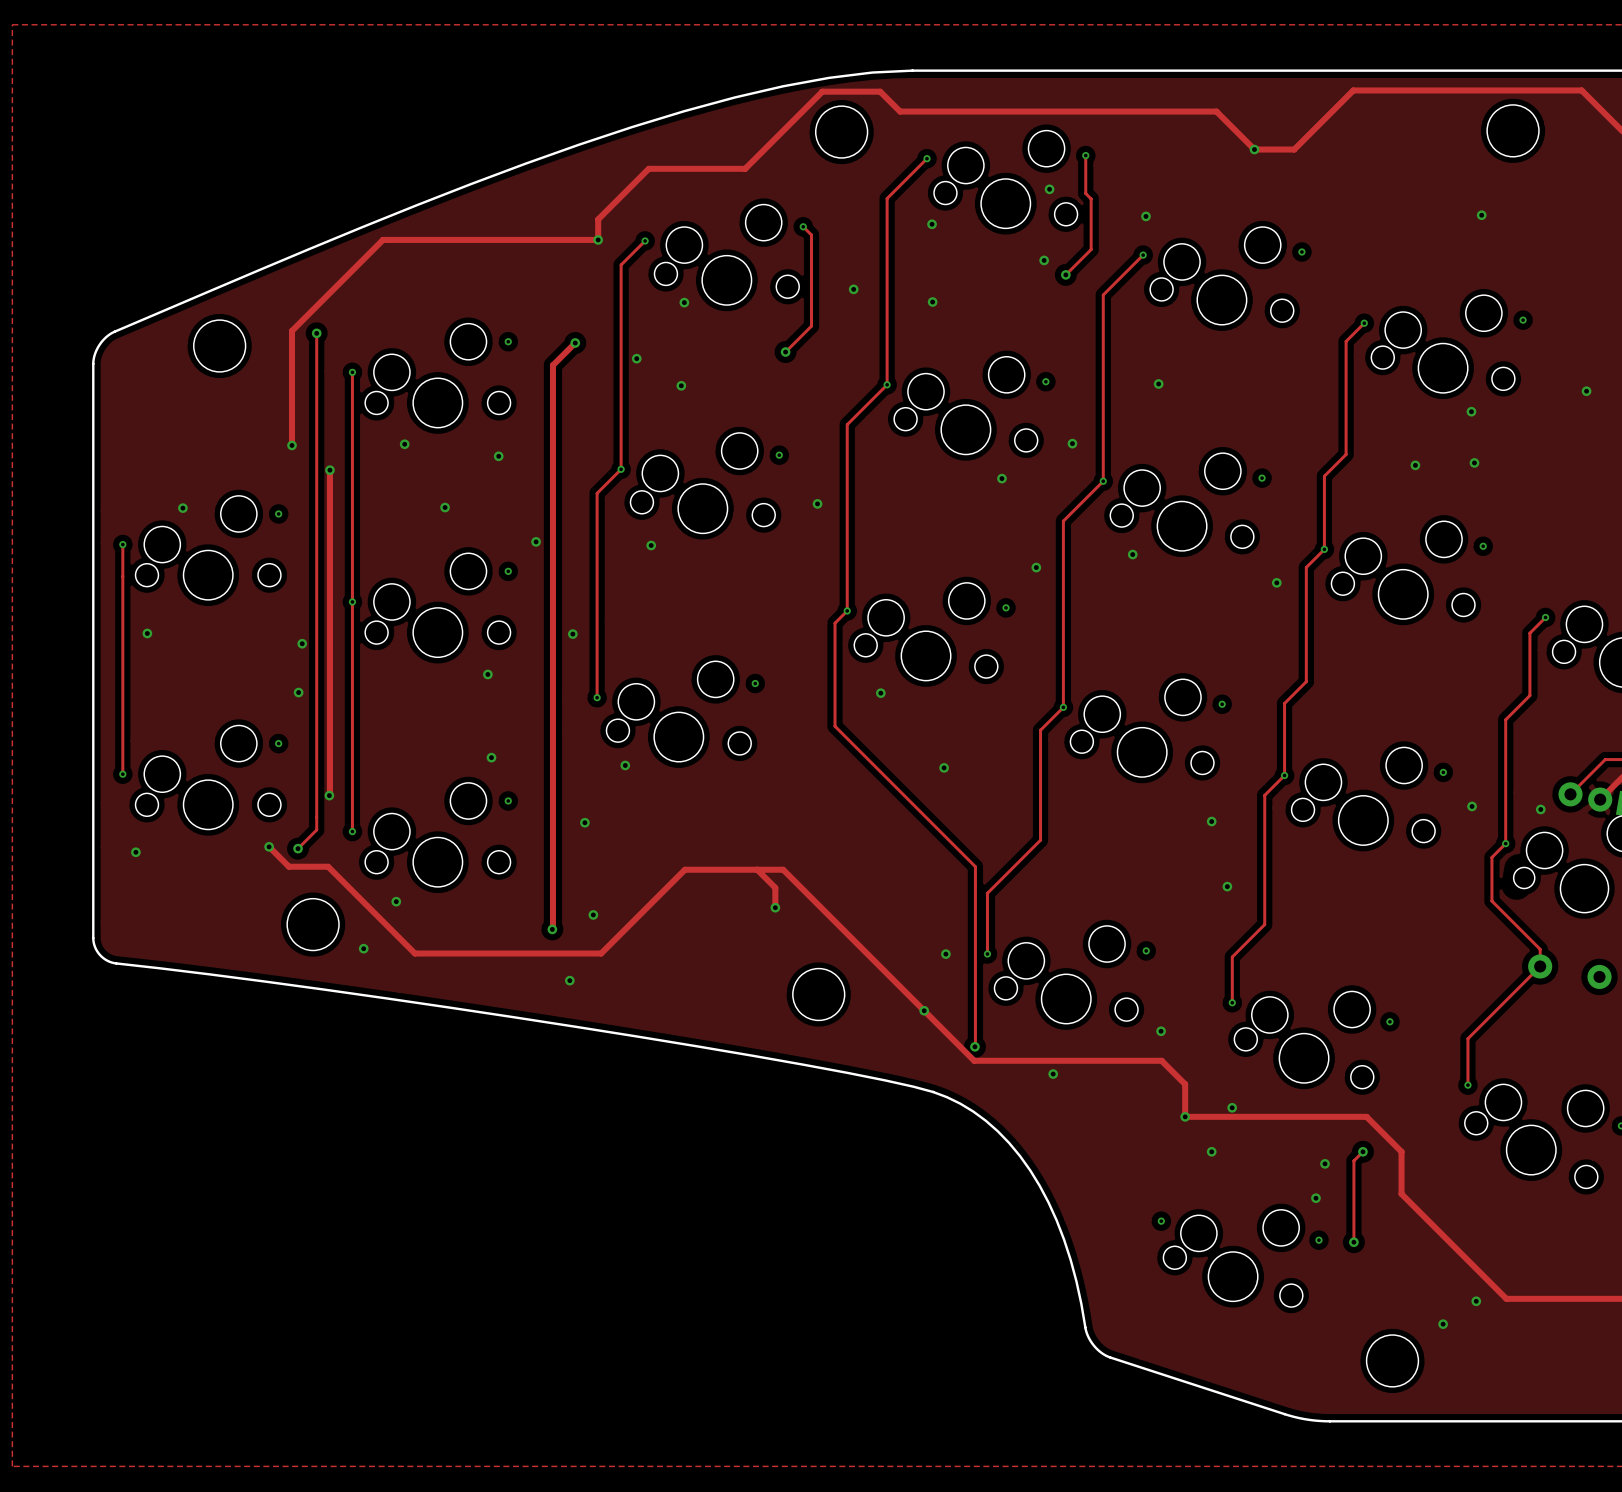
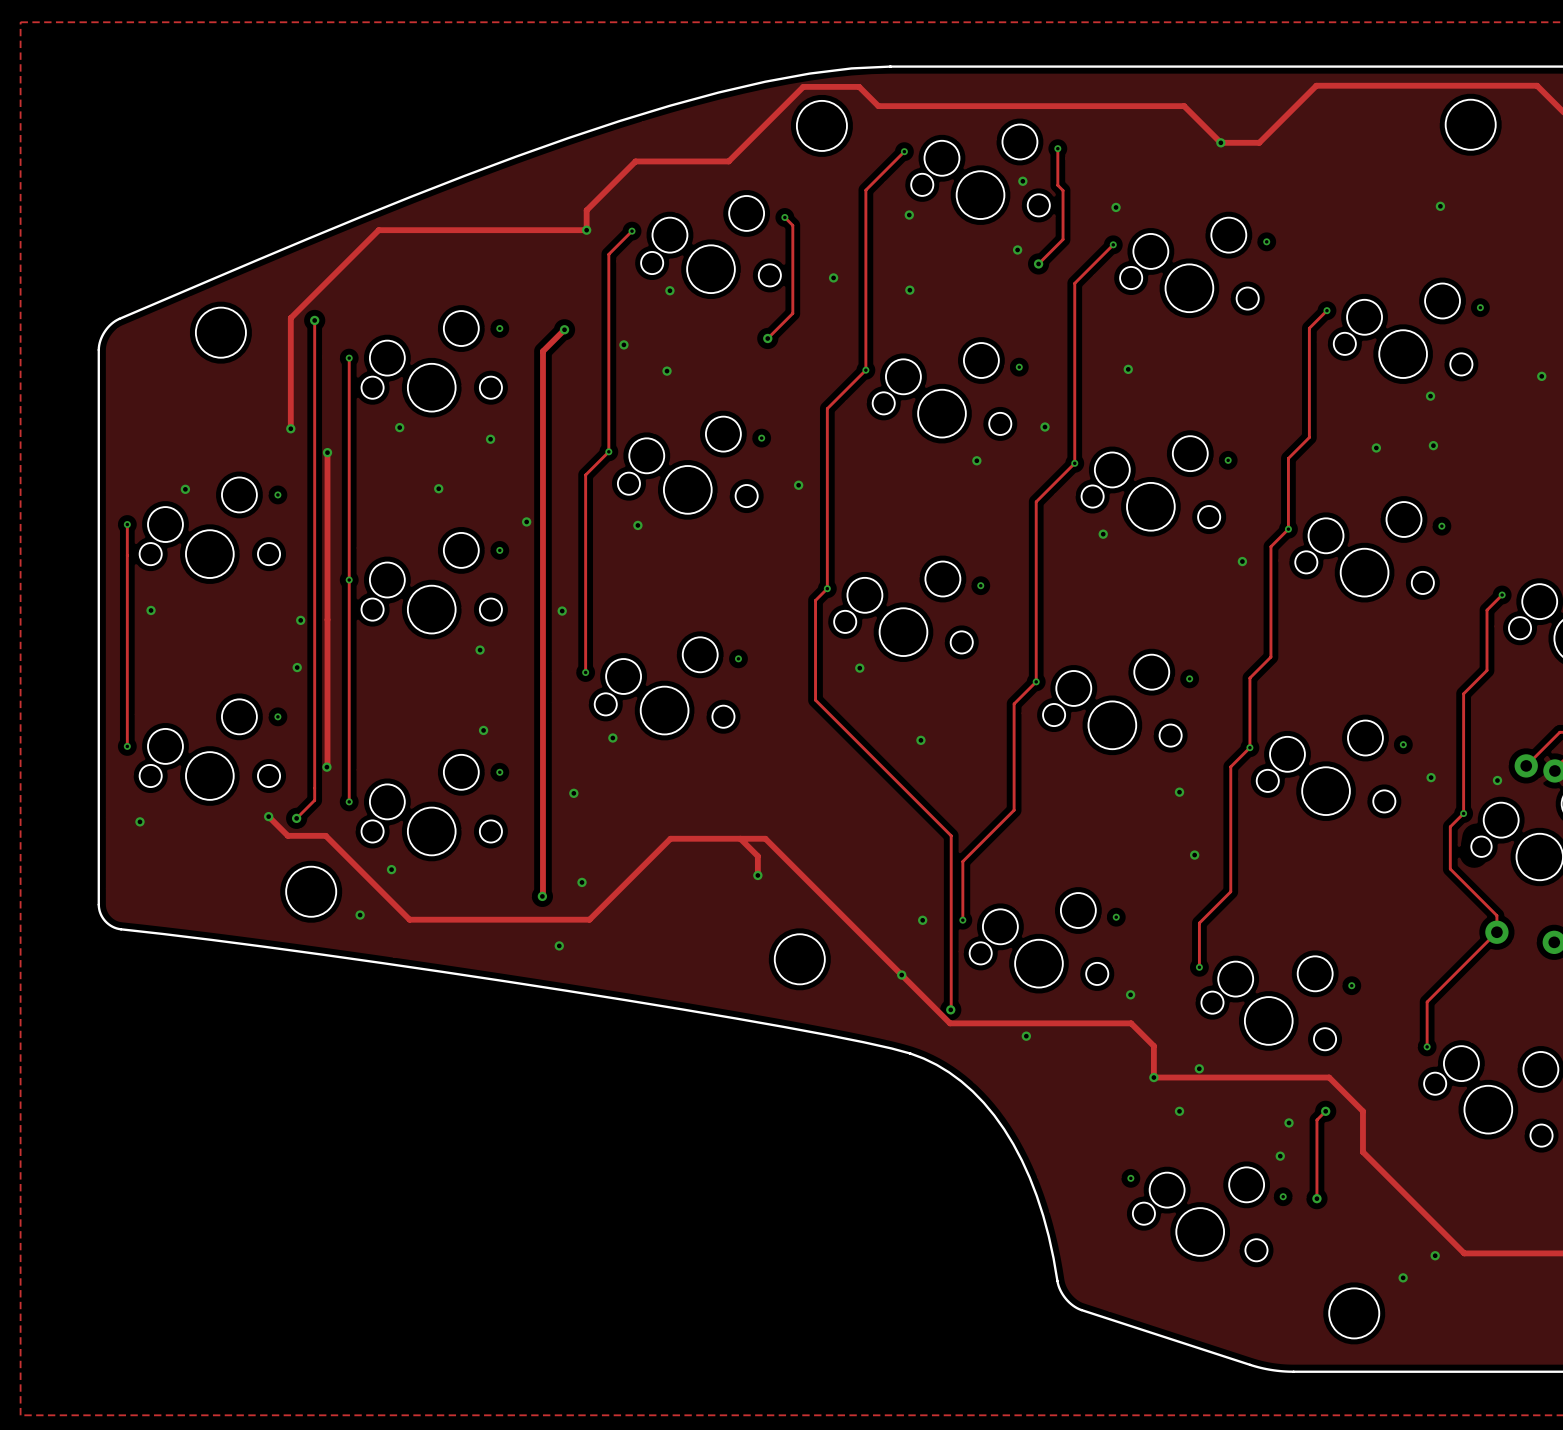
via: (1036, 567) -> none

